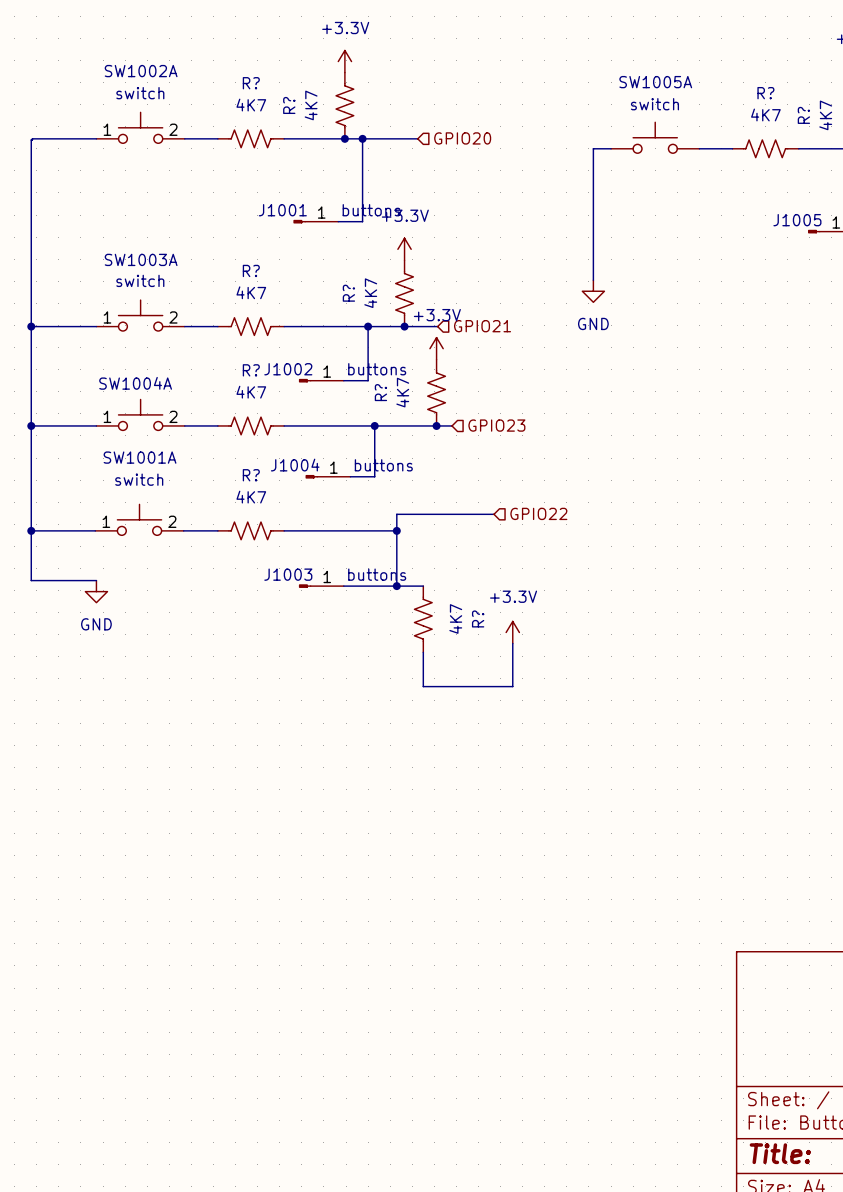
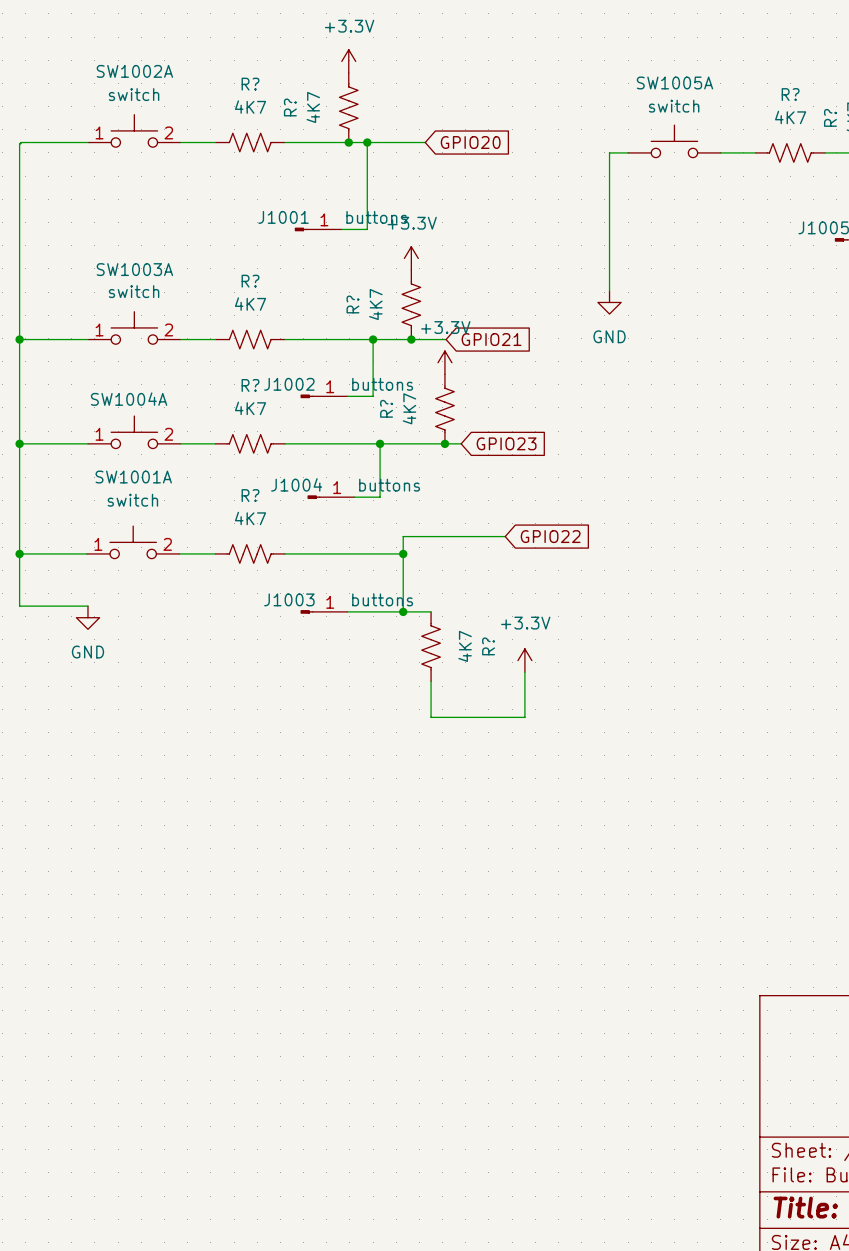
global label: none -> GPIO20 (470, 142)
hierarchical label: GPIO20 (462, 138) -> none
global label: none -> GPIO21 (491, 339)
hierarchical label: GPIO21 (482, 326) -> none
global label: none -> GPIO23 (506, 443)
hierarchical label: GPIO23 (496, 425) -> none
hierarchical label: GPIO22 (538, 513) -> none
global label: none -> GPIO22 (550, 536)

